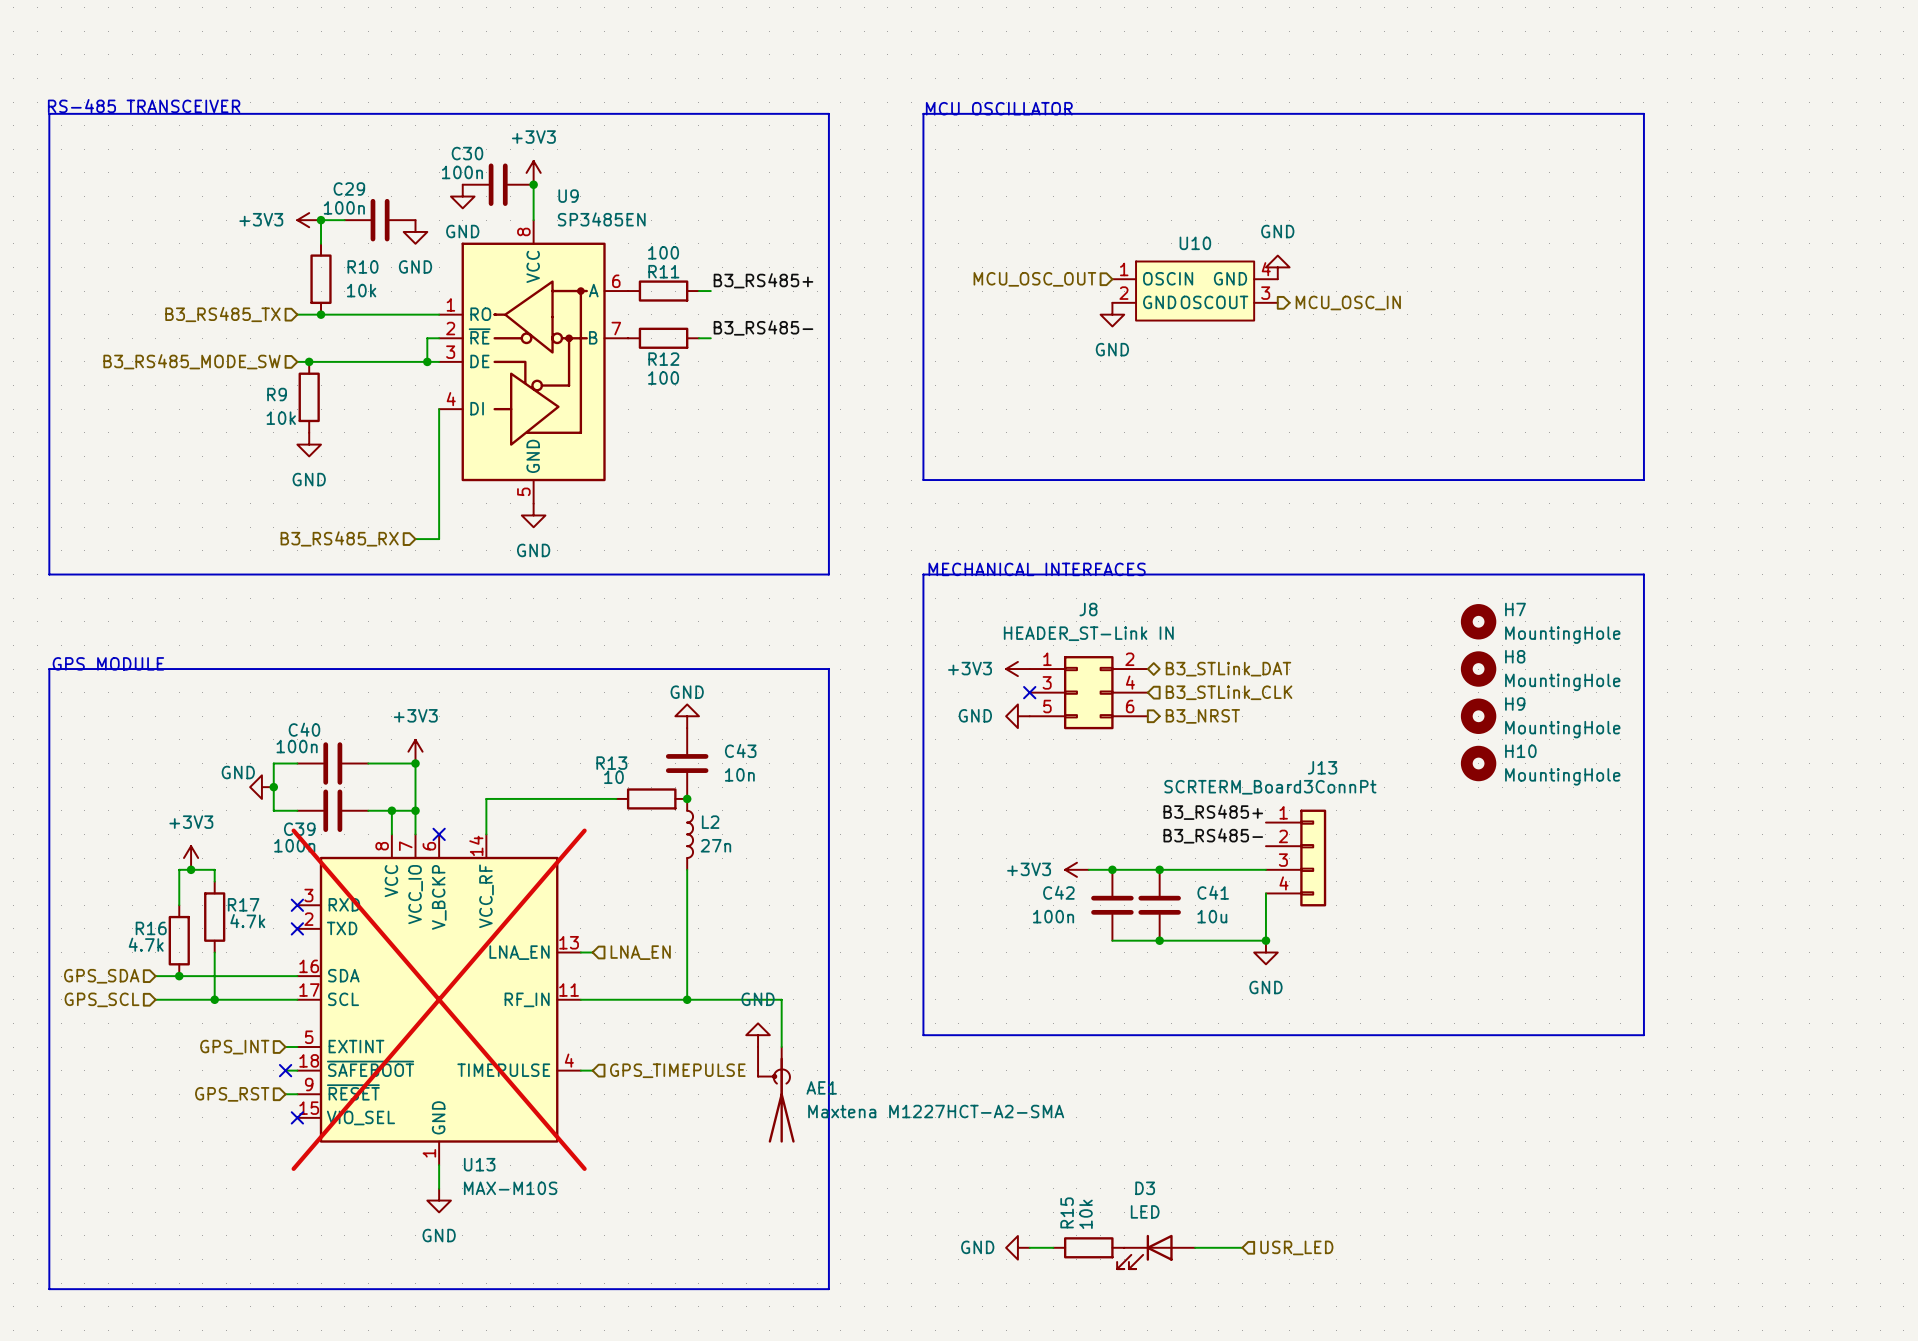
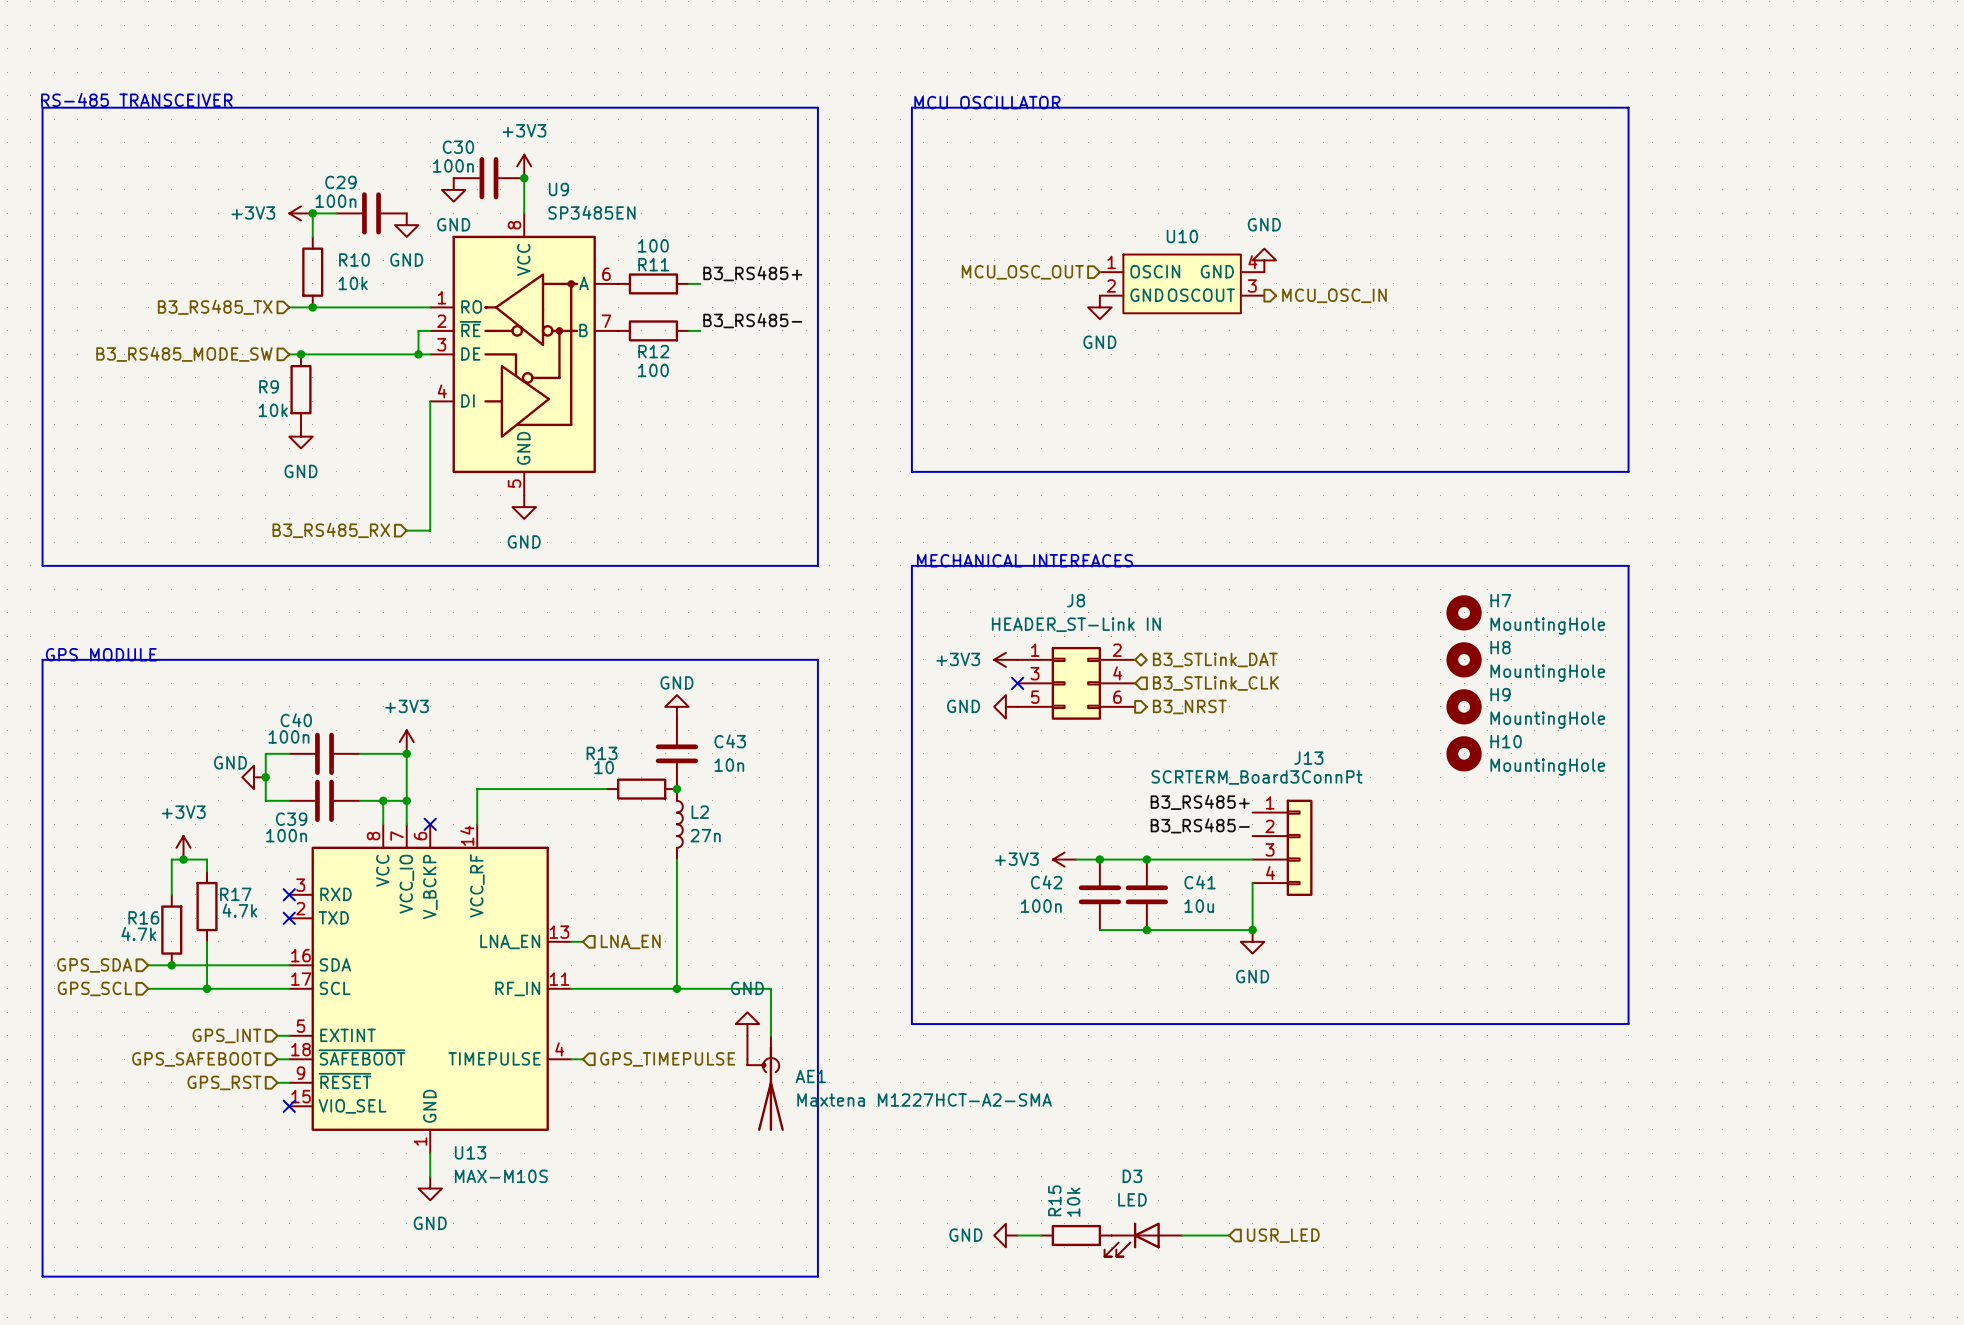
U13 do-not-place cross: (439, 999) -> none
hierarchical label: none -> GPS_SAFEBOOT (196, 1059)
no-connect mark: (285, 1070) -> none

